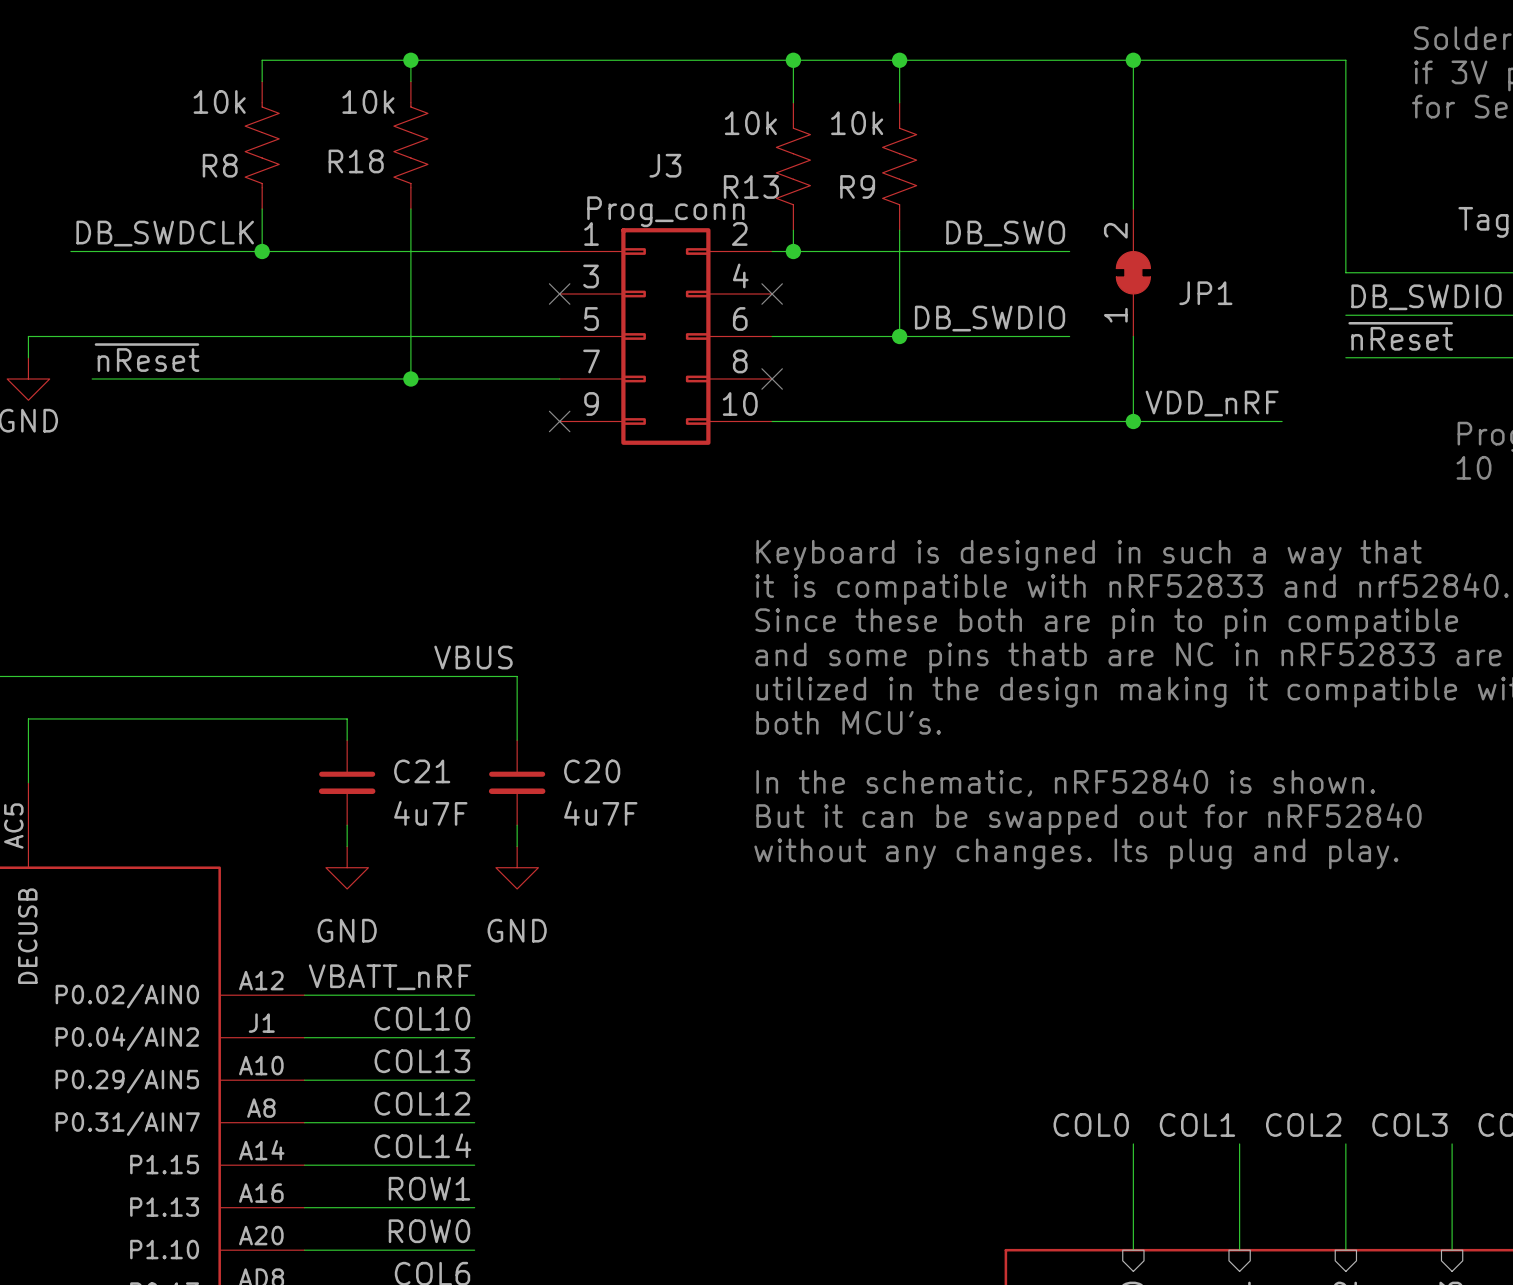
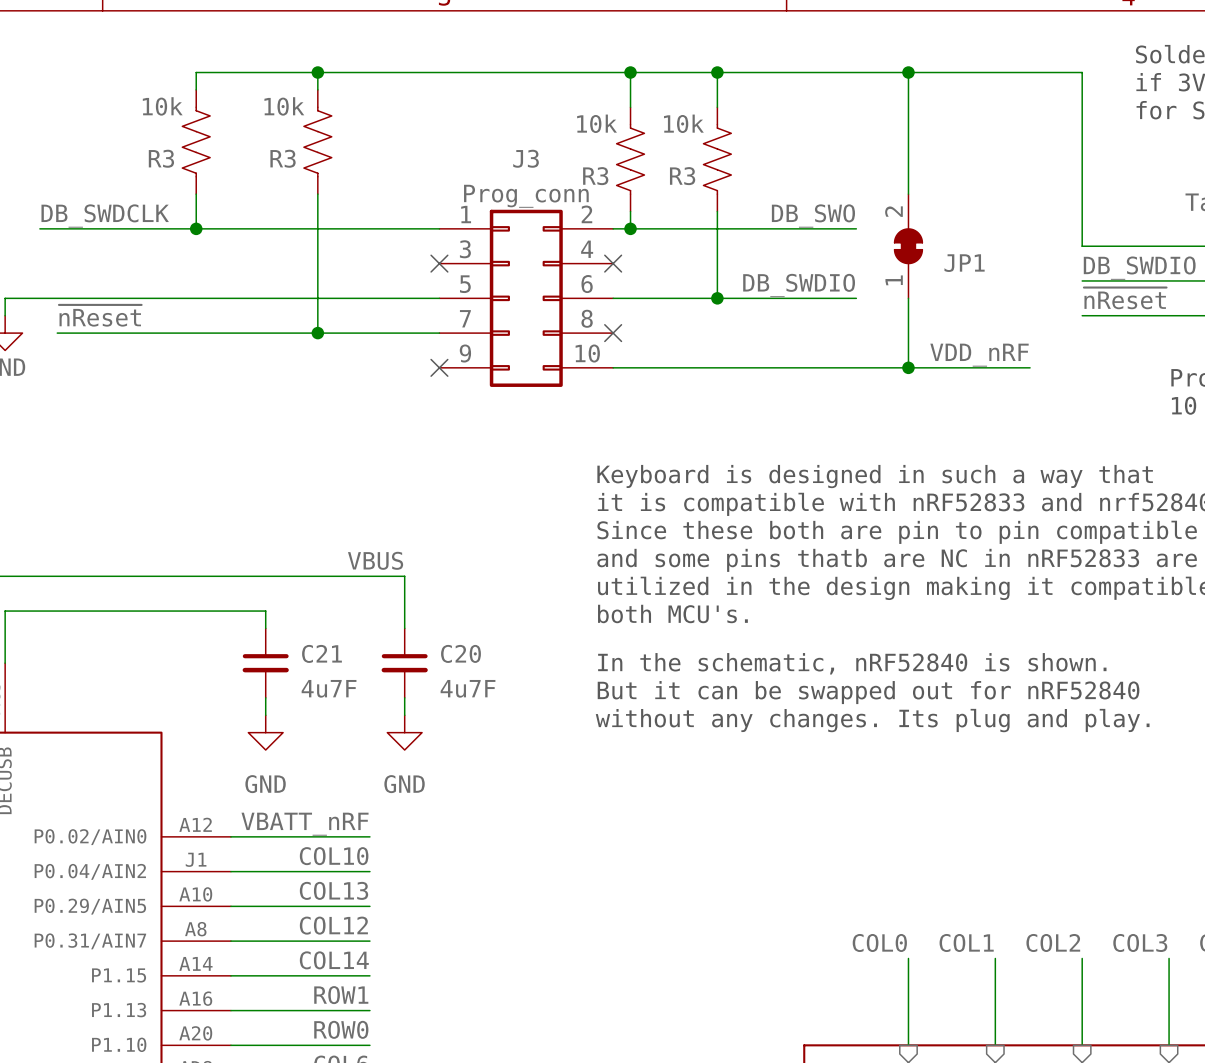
R18 name: R18 (356, 161) -> R3 (283, 158)
R8 name: R8 (220, 165) -> R3 (161, 158)
R13 name: R13 (751, 186) -> R3 (595, 176)
R9 name: R9 (857, 186) -> R3 (682, 176)

